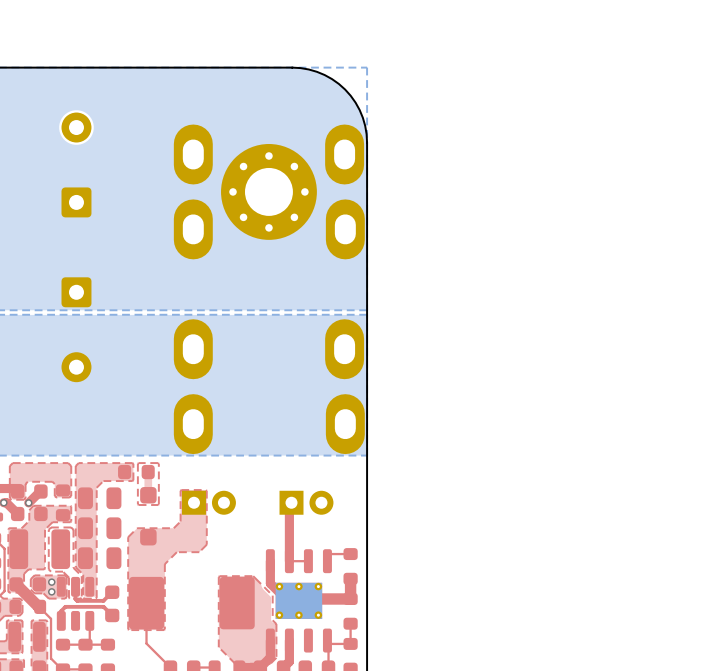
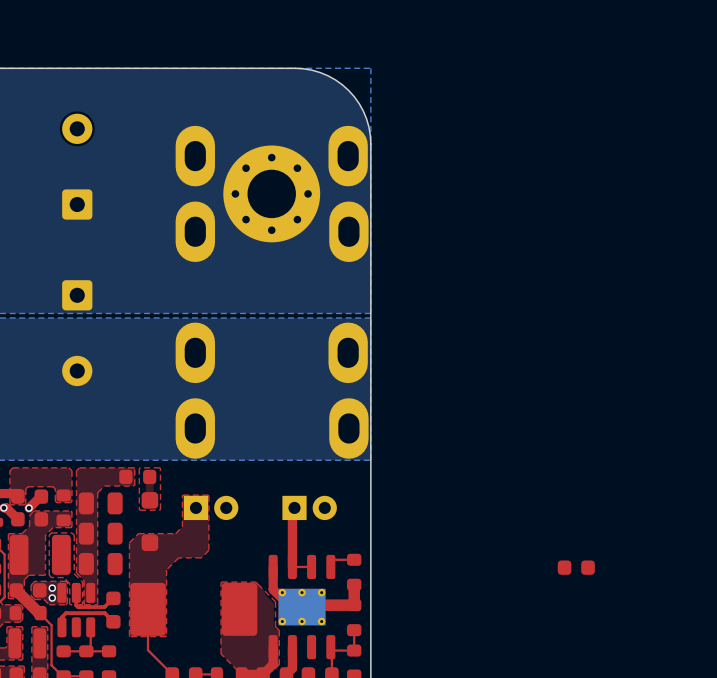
part: none -> (576, 567)

